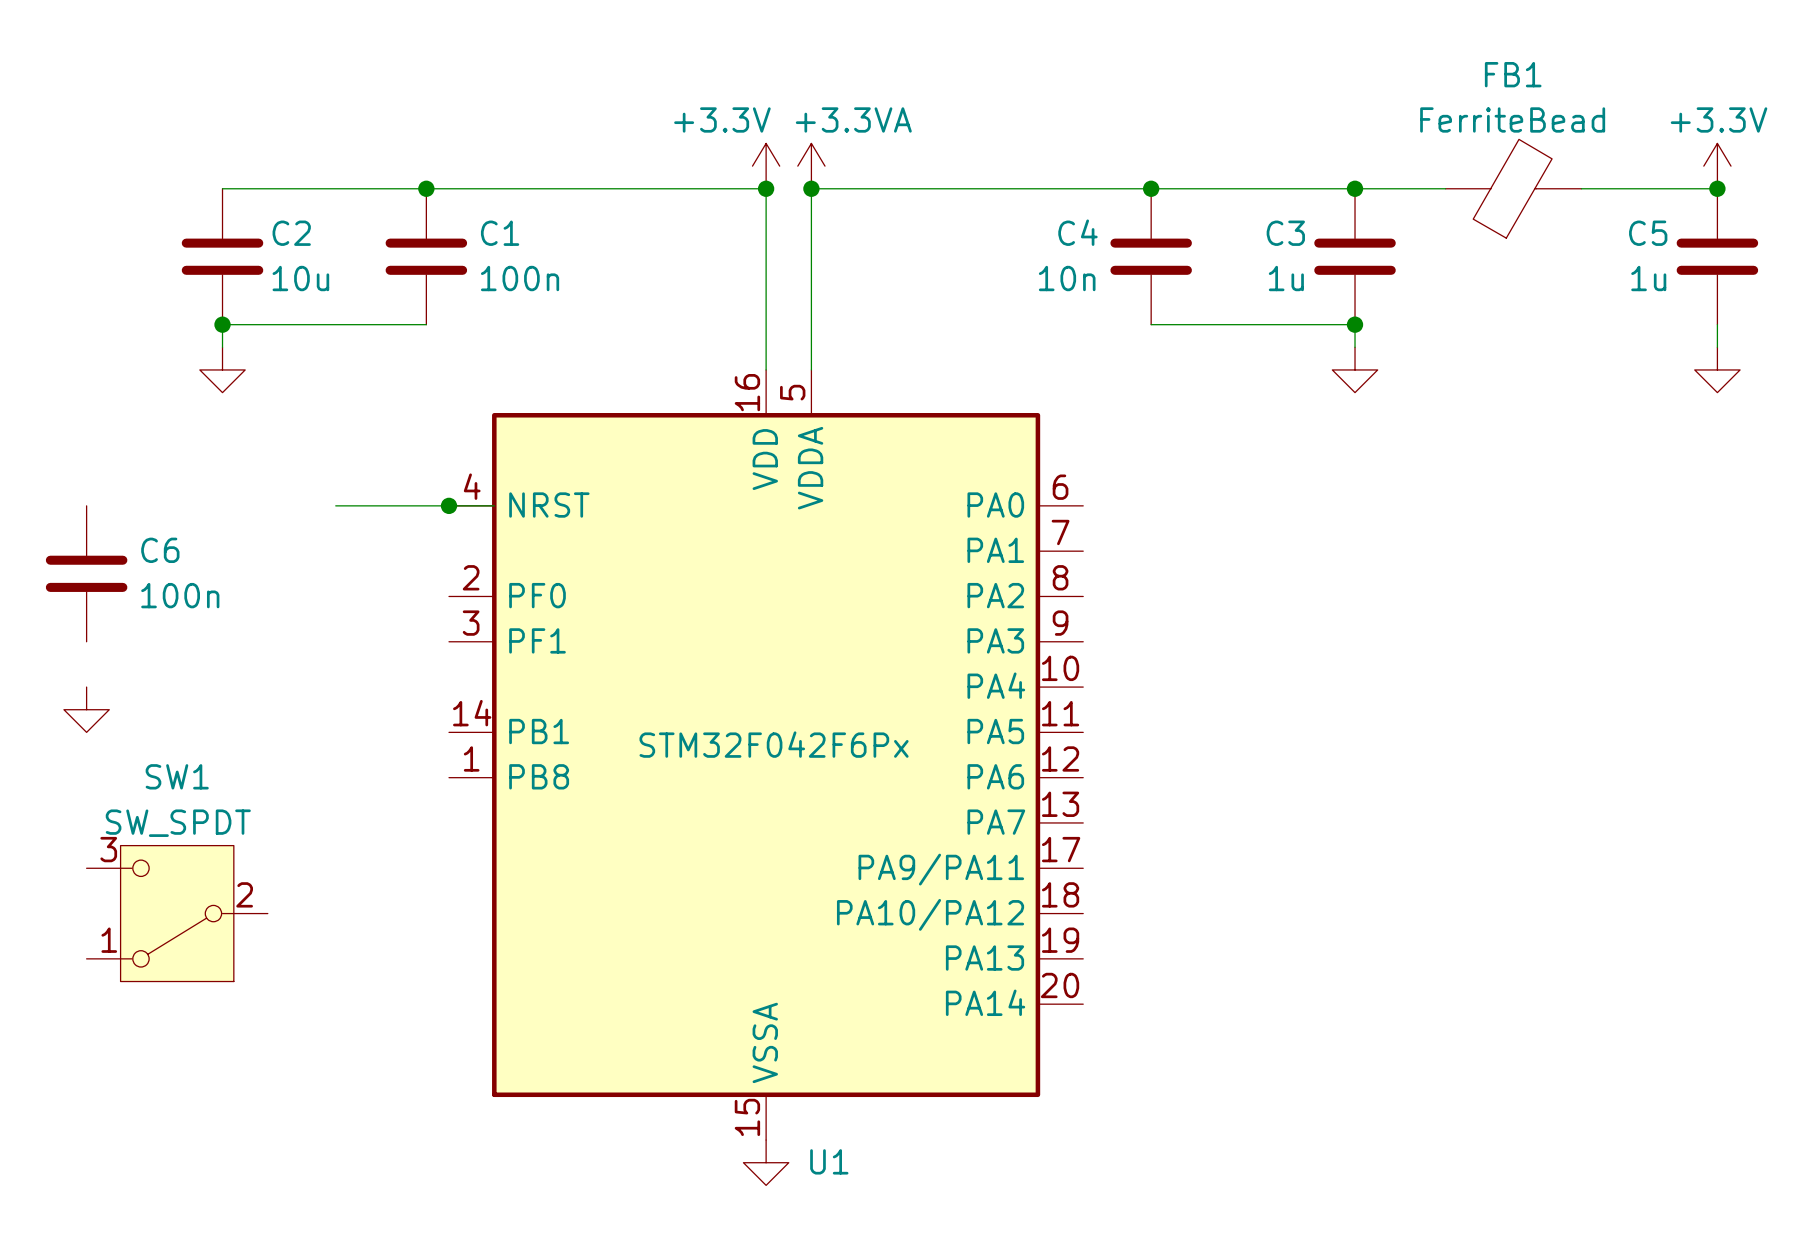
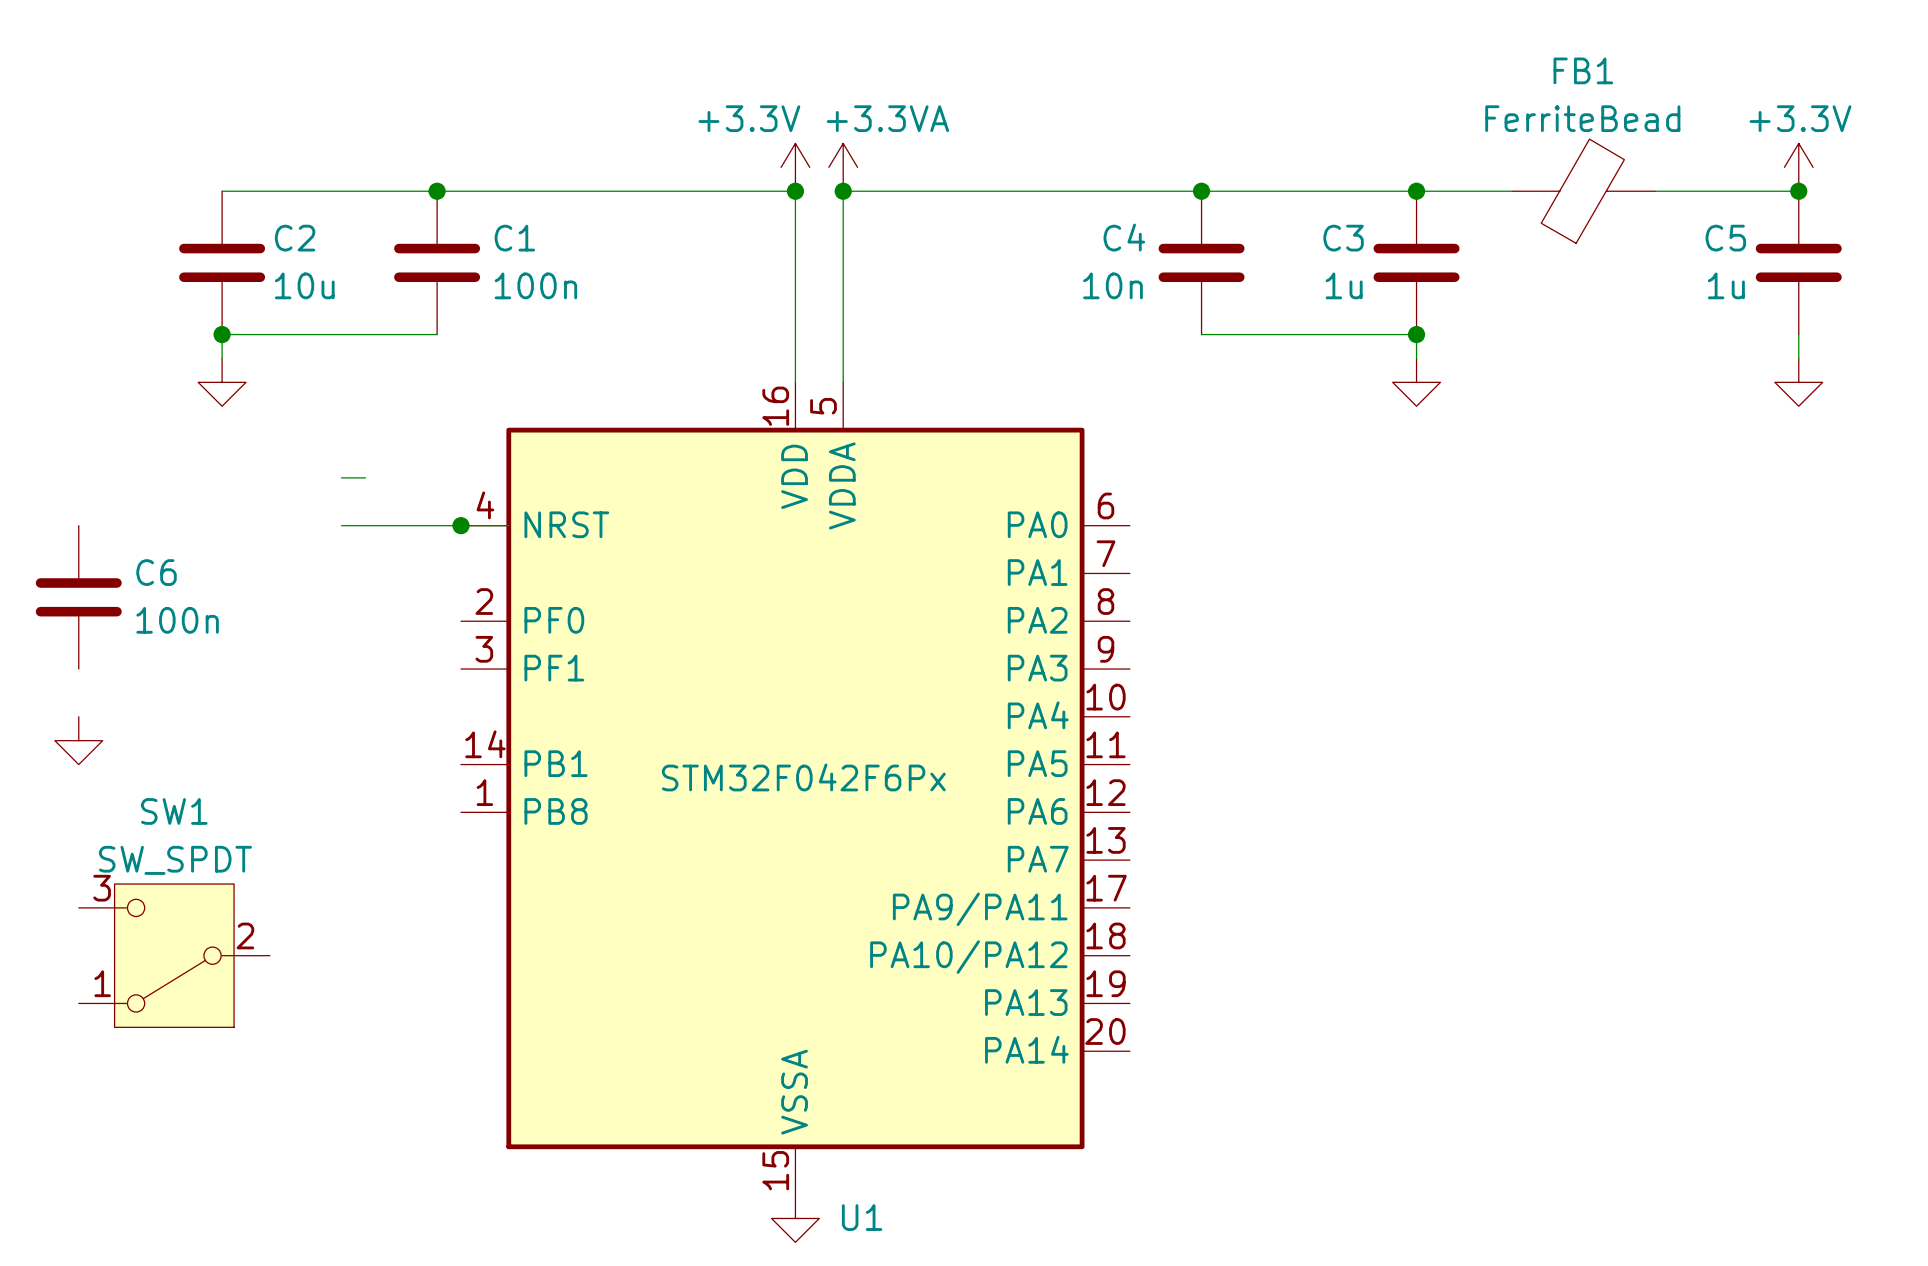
wire: none -> (341, 477) (365, 477)

